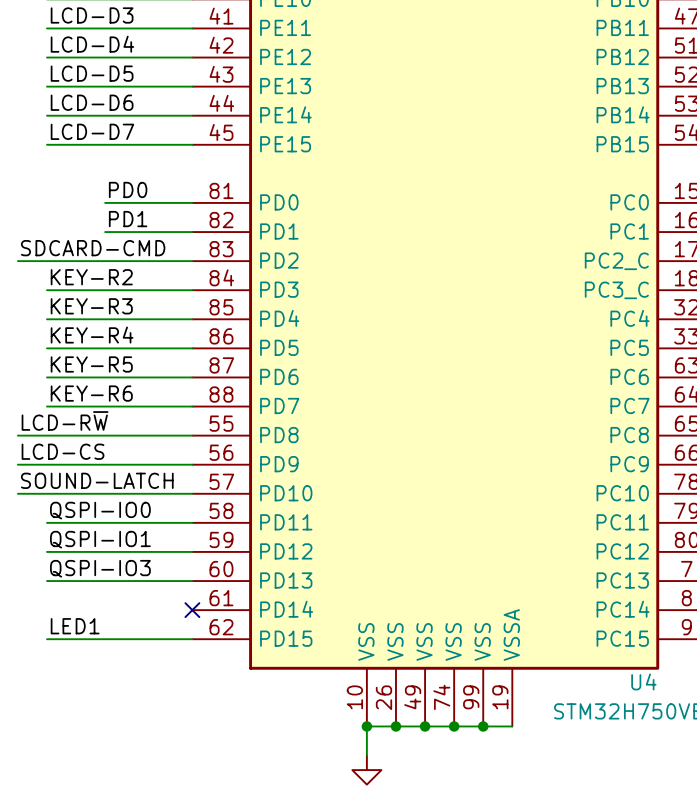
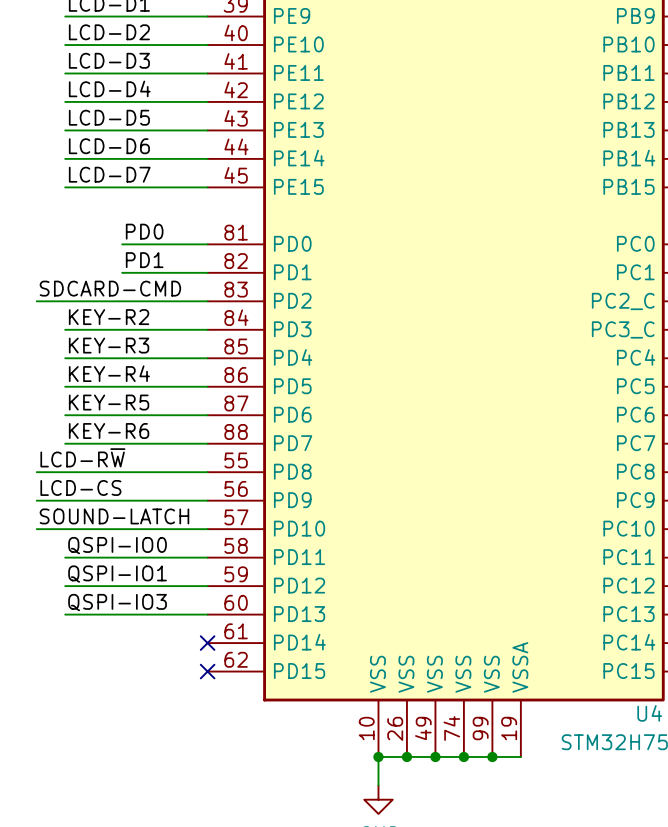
label: LED1 (75, 626) -> none
wire: (46, 639) (192, 639) -> none
no-connect mark: none -> (207, 671)

